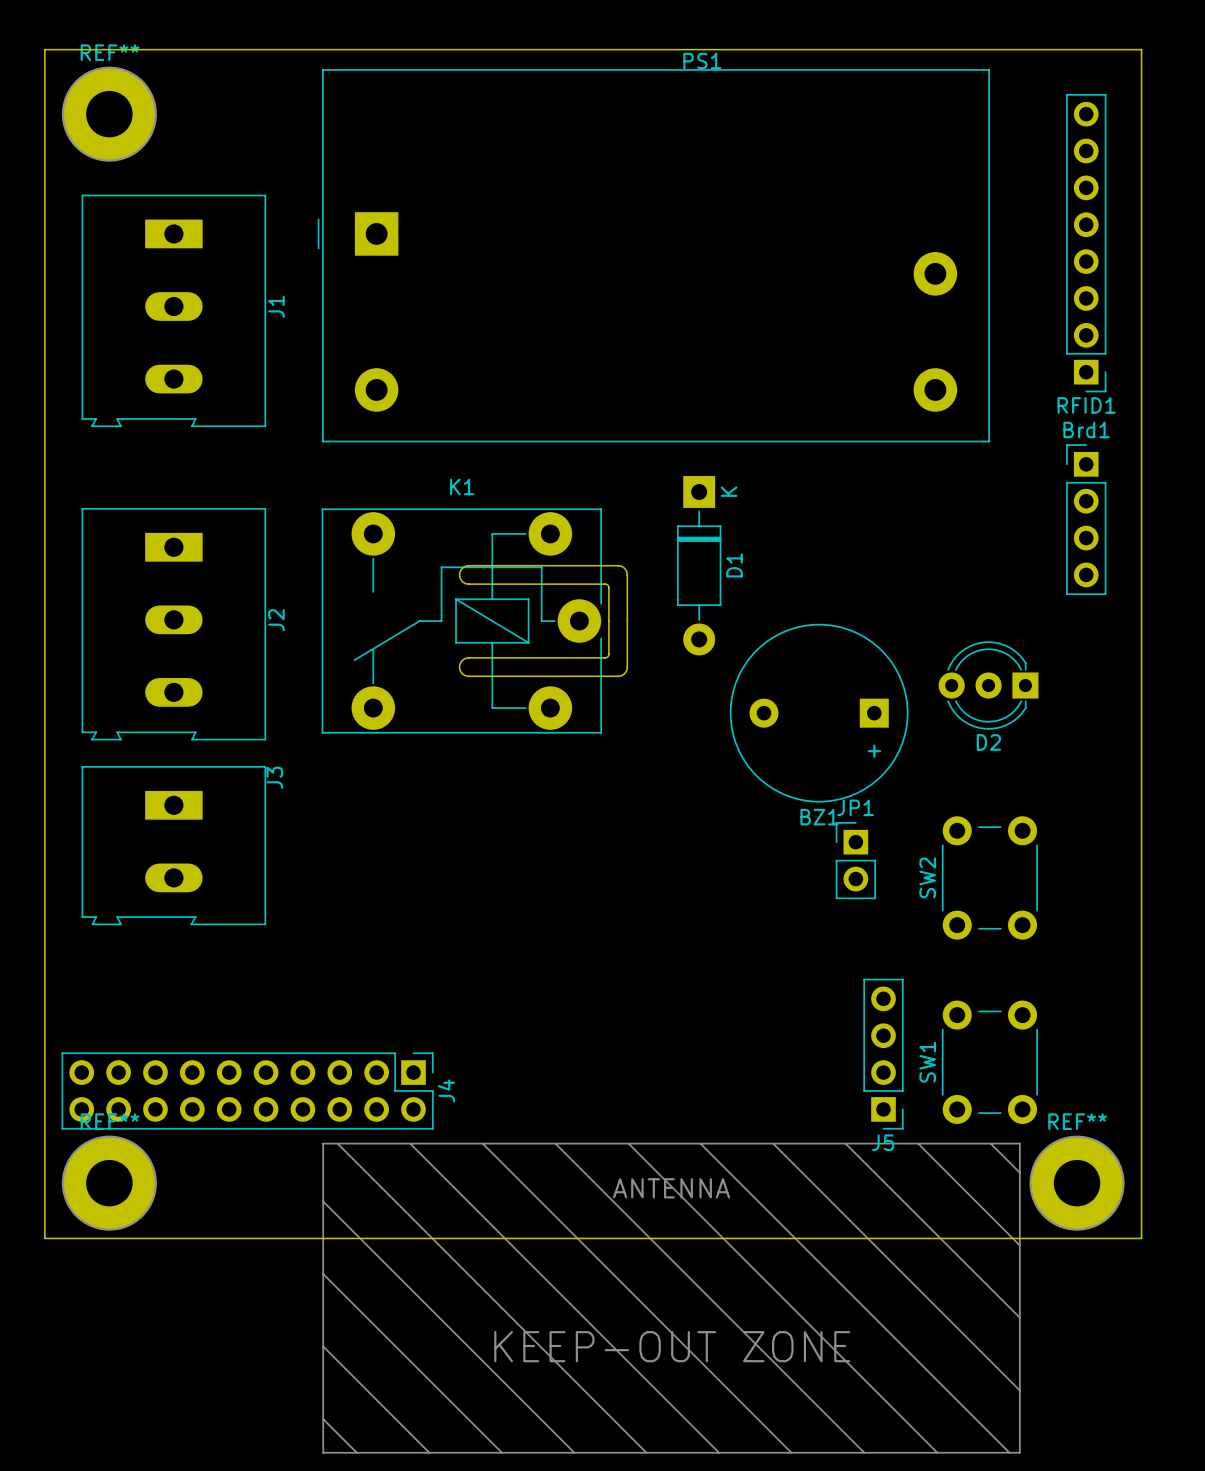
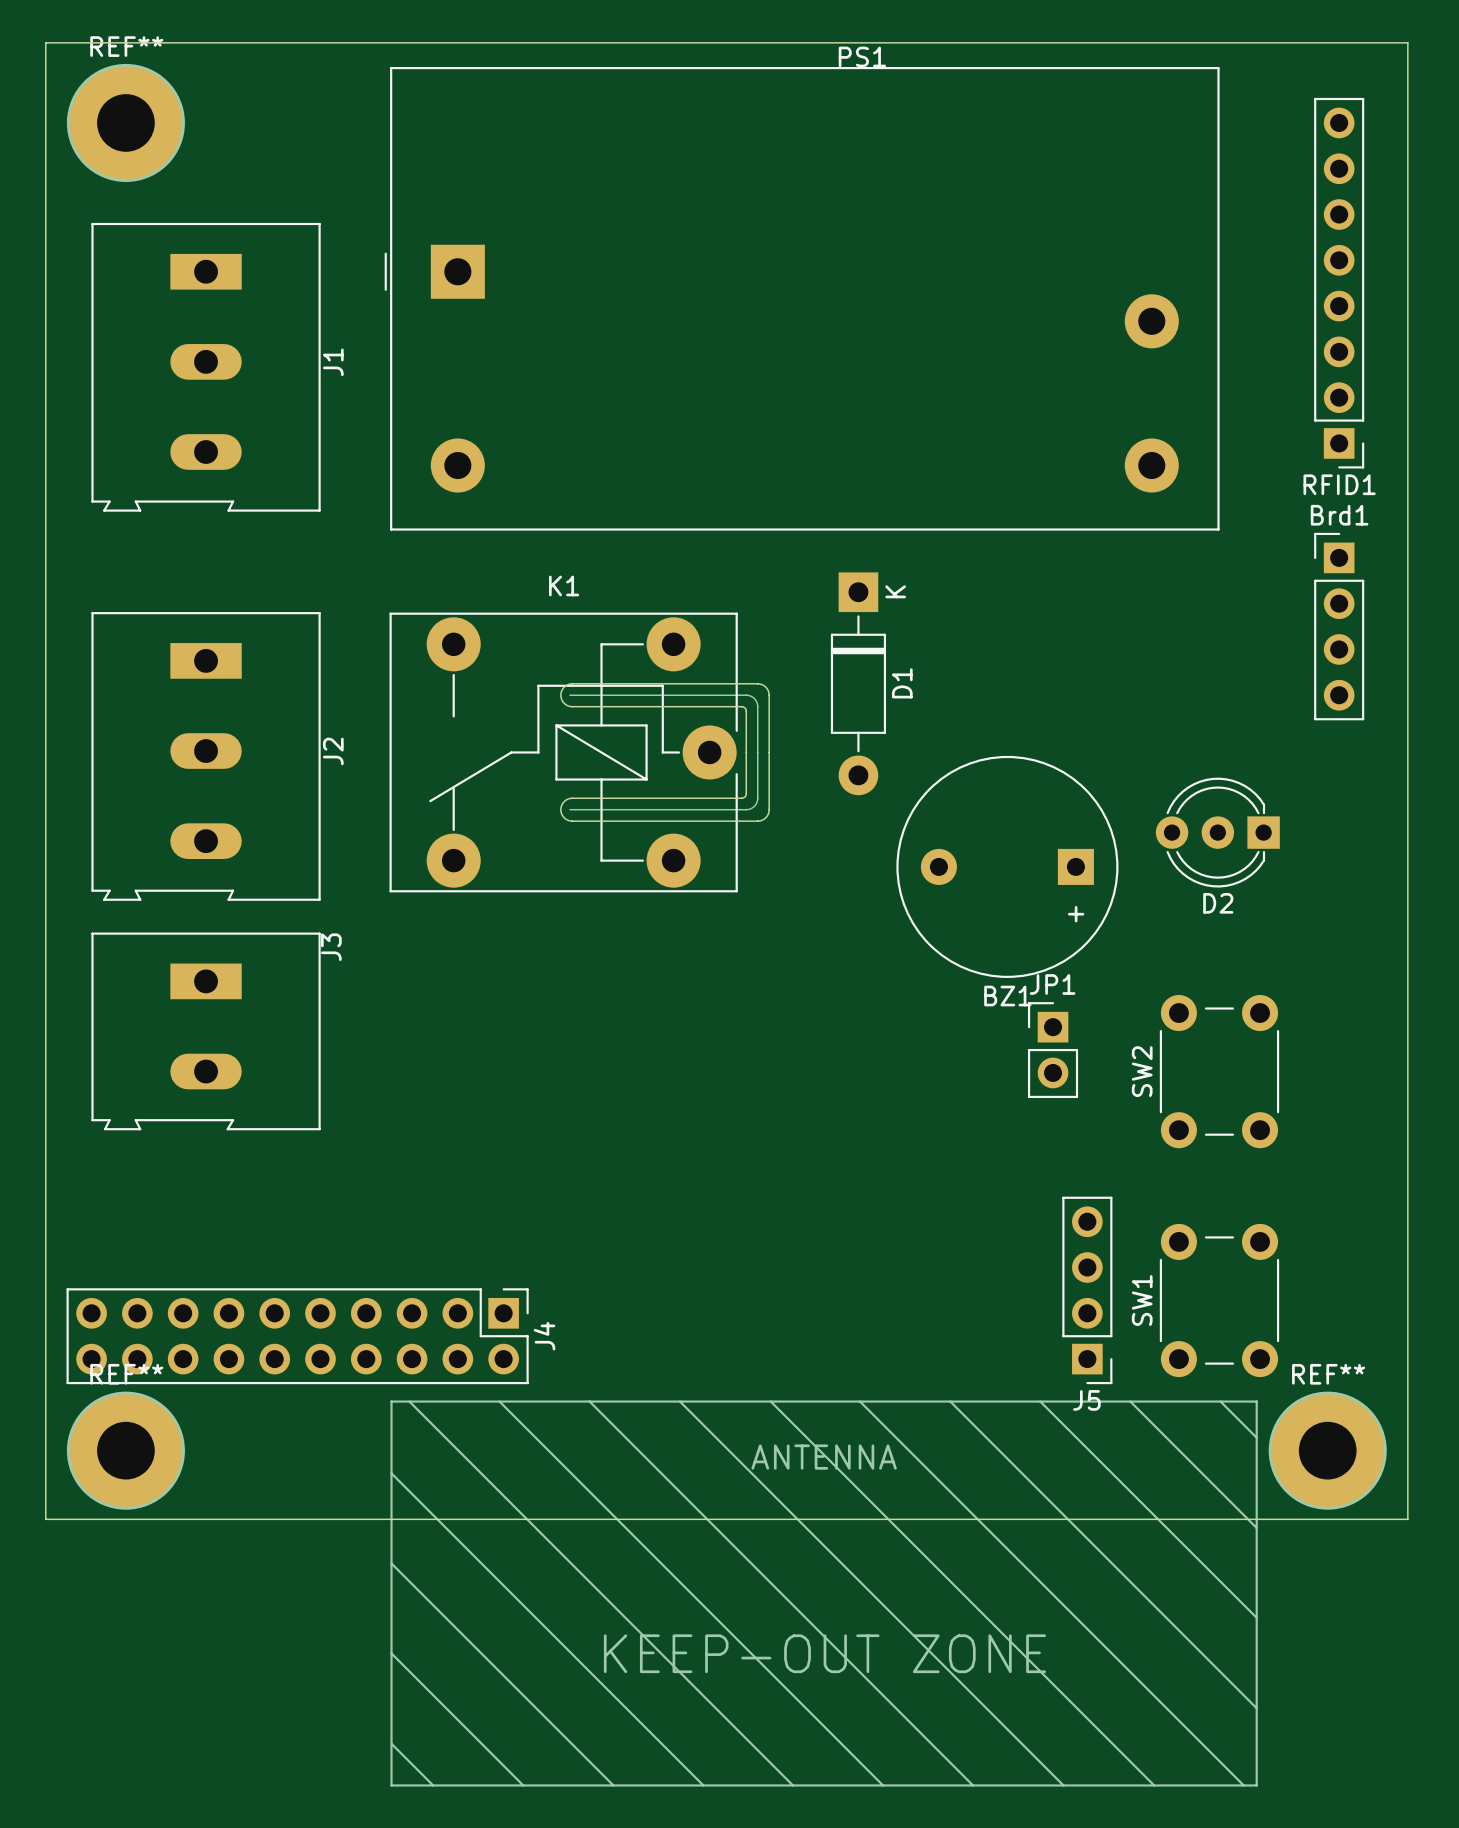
line: none -> (570, 695) (746, 695)
line: none -> (746, 695) (754, 698) (757, 706) (757, 798) (756, 803) (752, 808) (570, 809)

